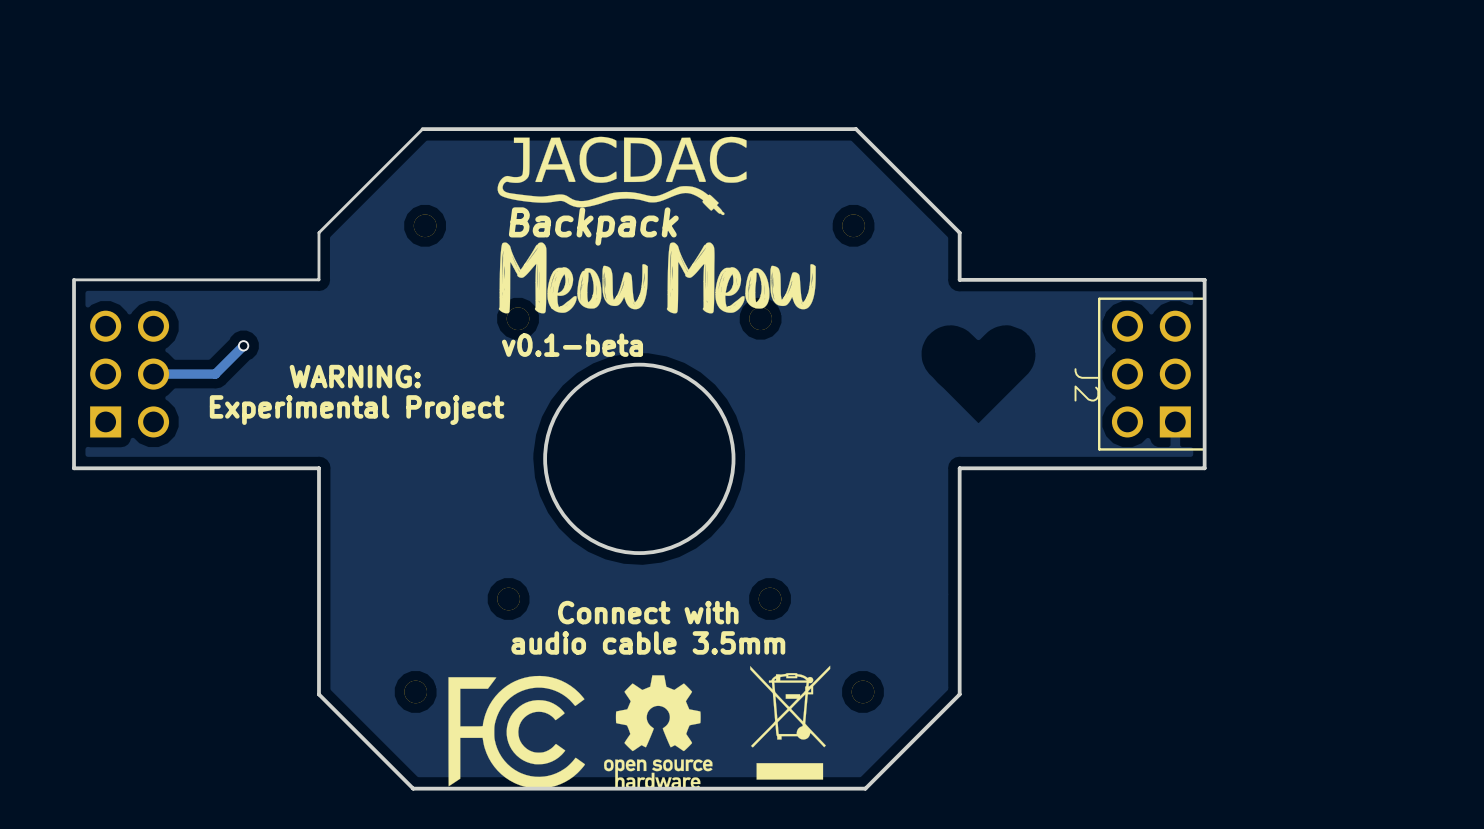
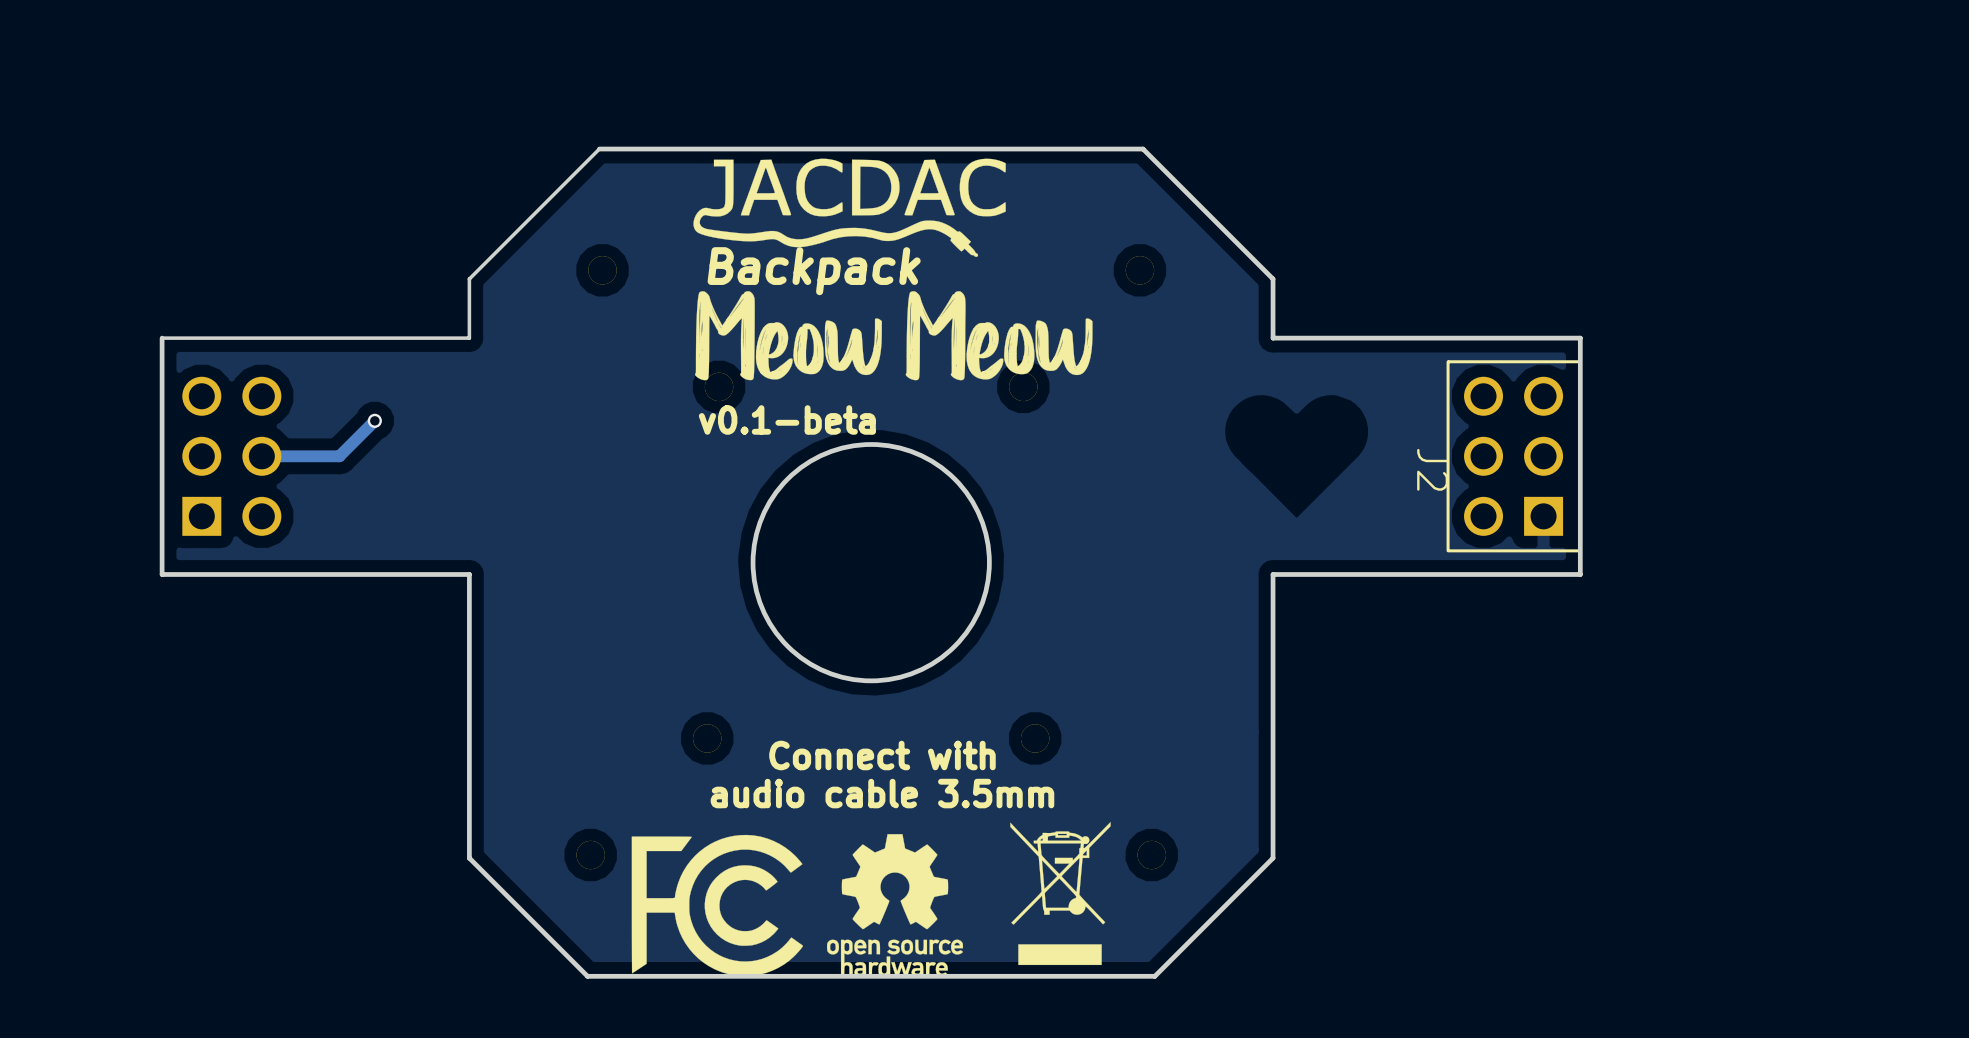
text: WARNING: (355, 376) -> none
text: Experimental Project (357, 410) -> none

